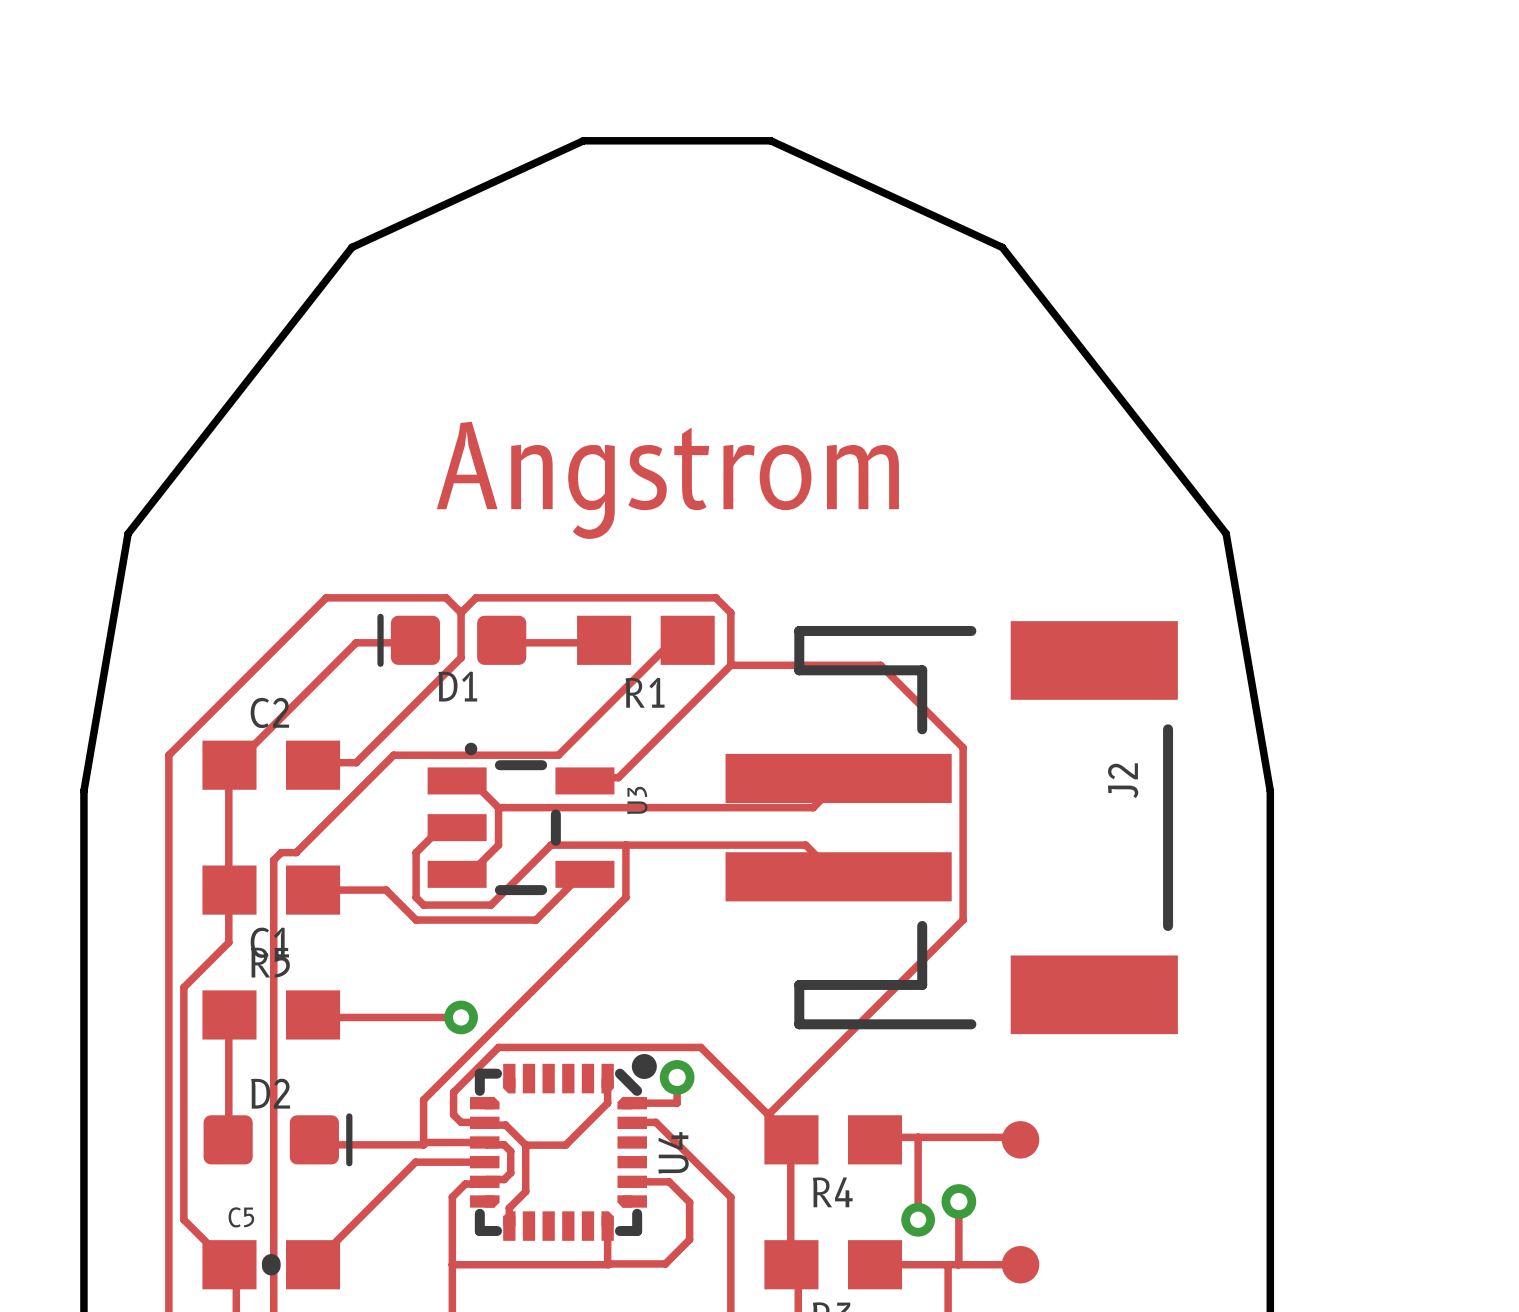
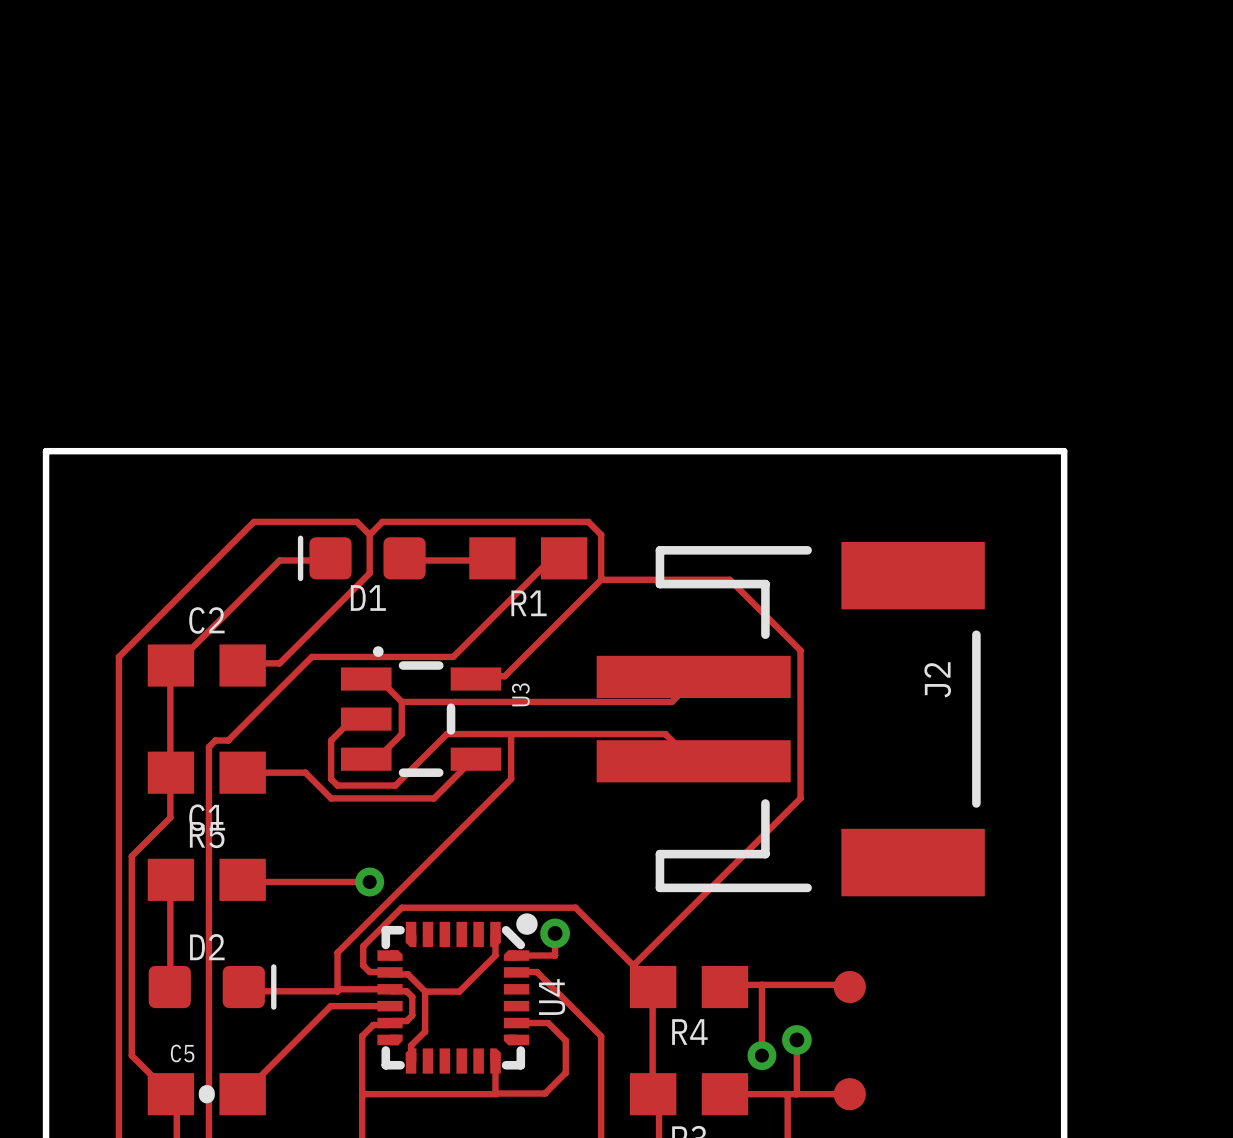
text: Angstrom (667, 480) -> none
board edge: (83, 791) (128, 533) (351, 247) (583, 140) (770, 140) (1002, 247) (1226, 533) (1270, 791) -> (46, 687) (46, 451) (1064, 451) (1064, 687)

